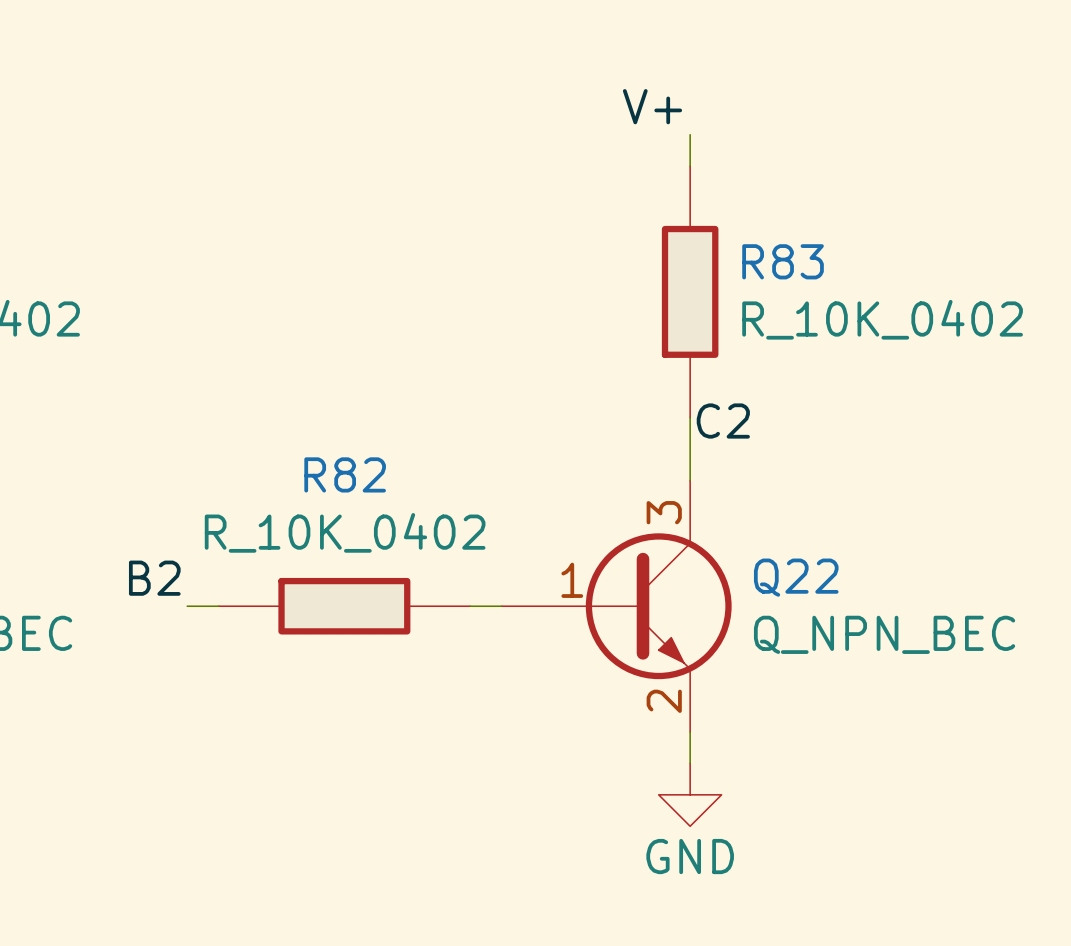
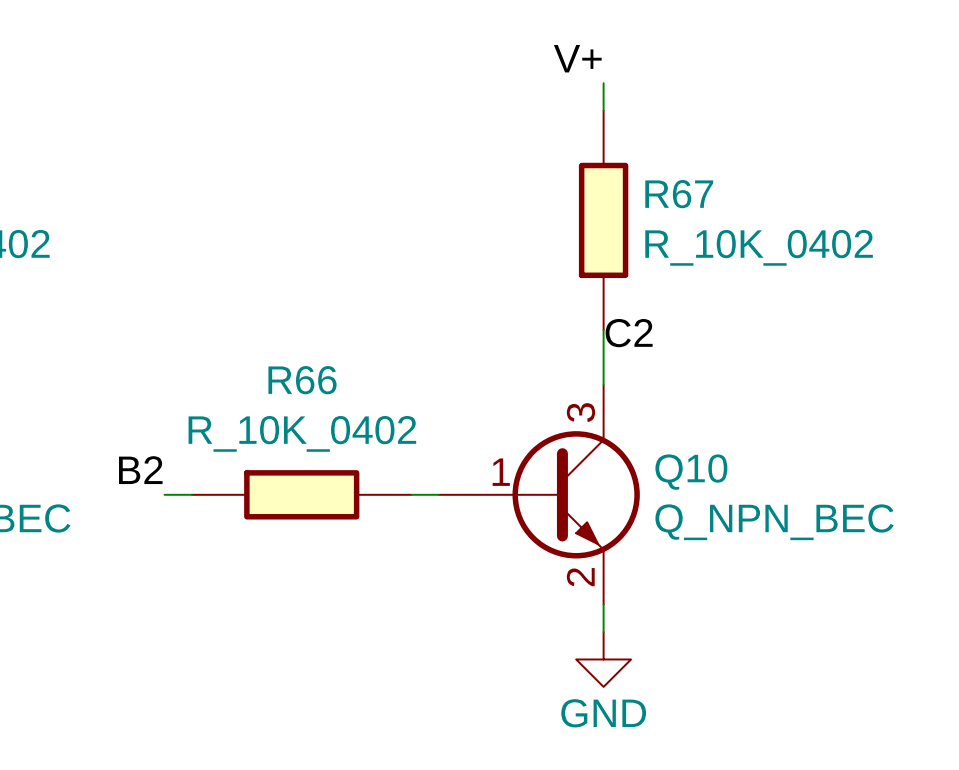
R83 name: R83 (783, 261) -> R67 (679, 194)
R82 name: R82 (345, 474) -> R66 (302, 380)
Q22 name: Q22 (796, 577) -> Q10 (691, 472)

